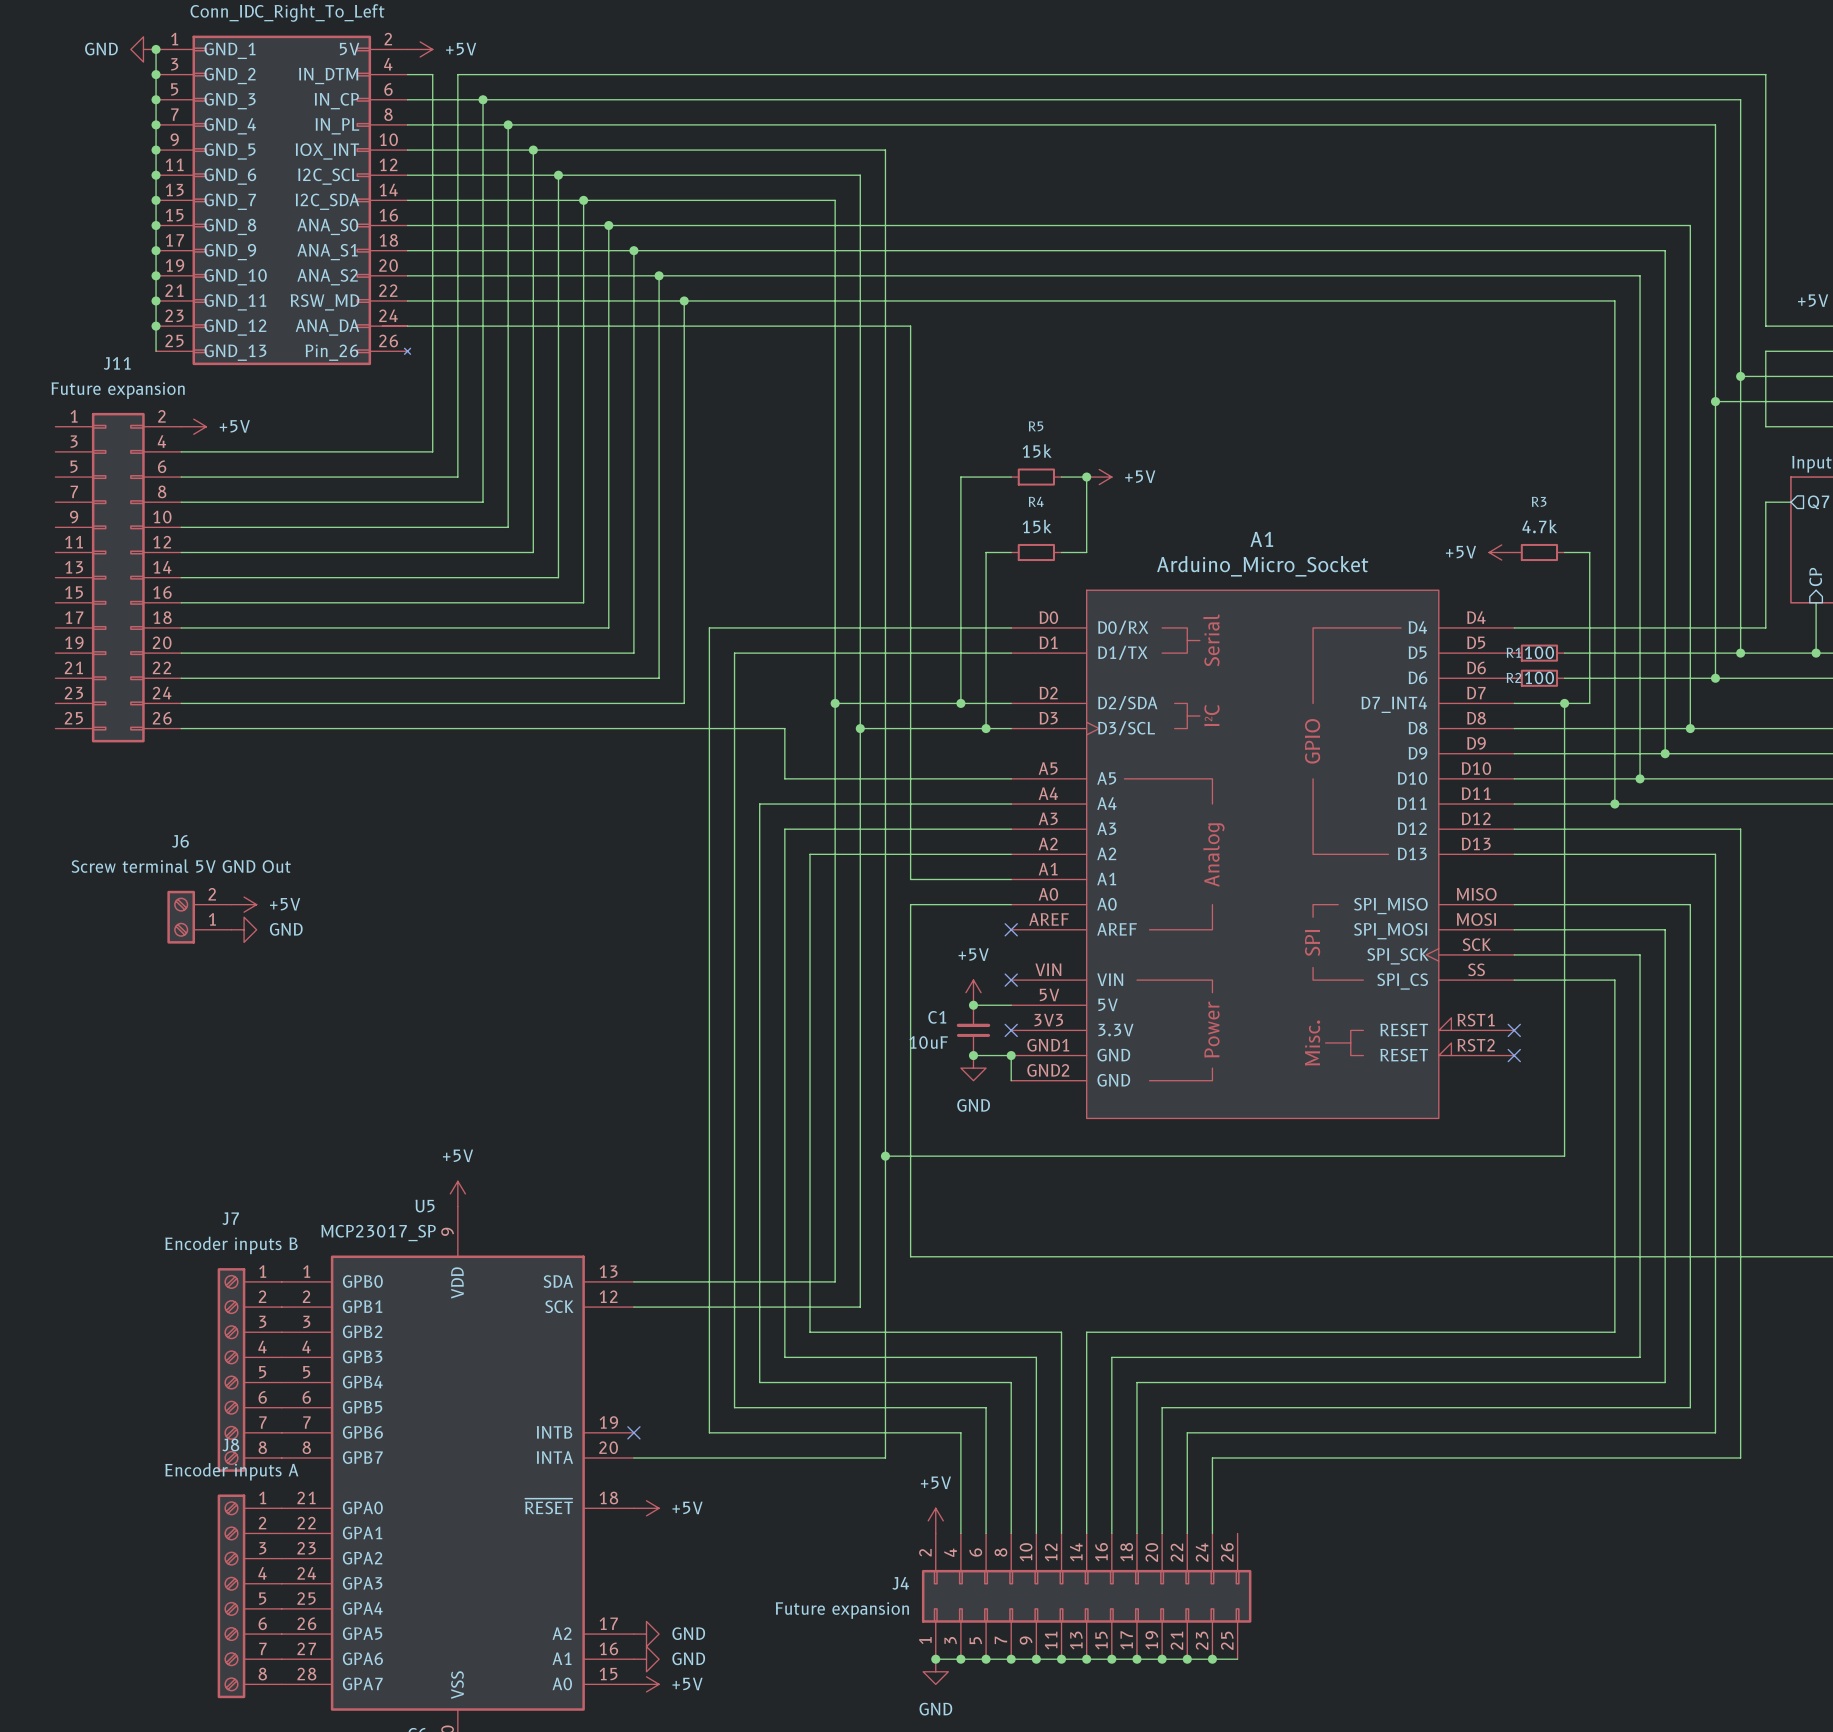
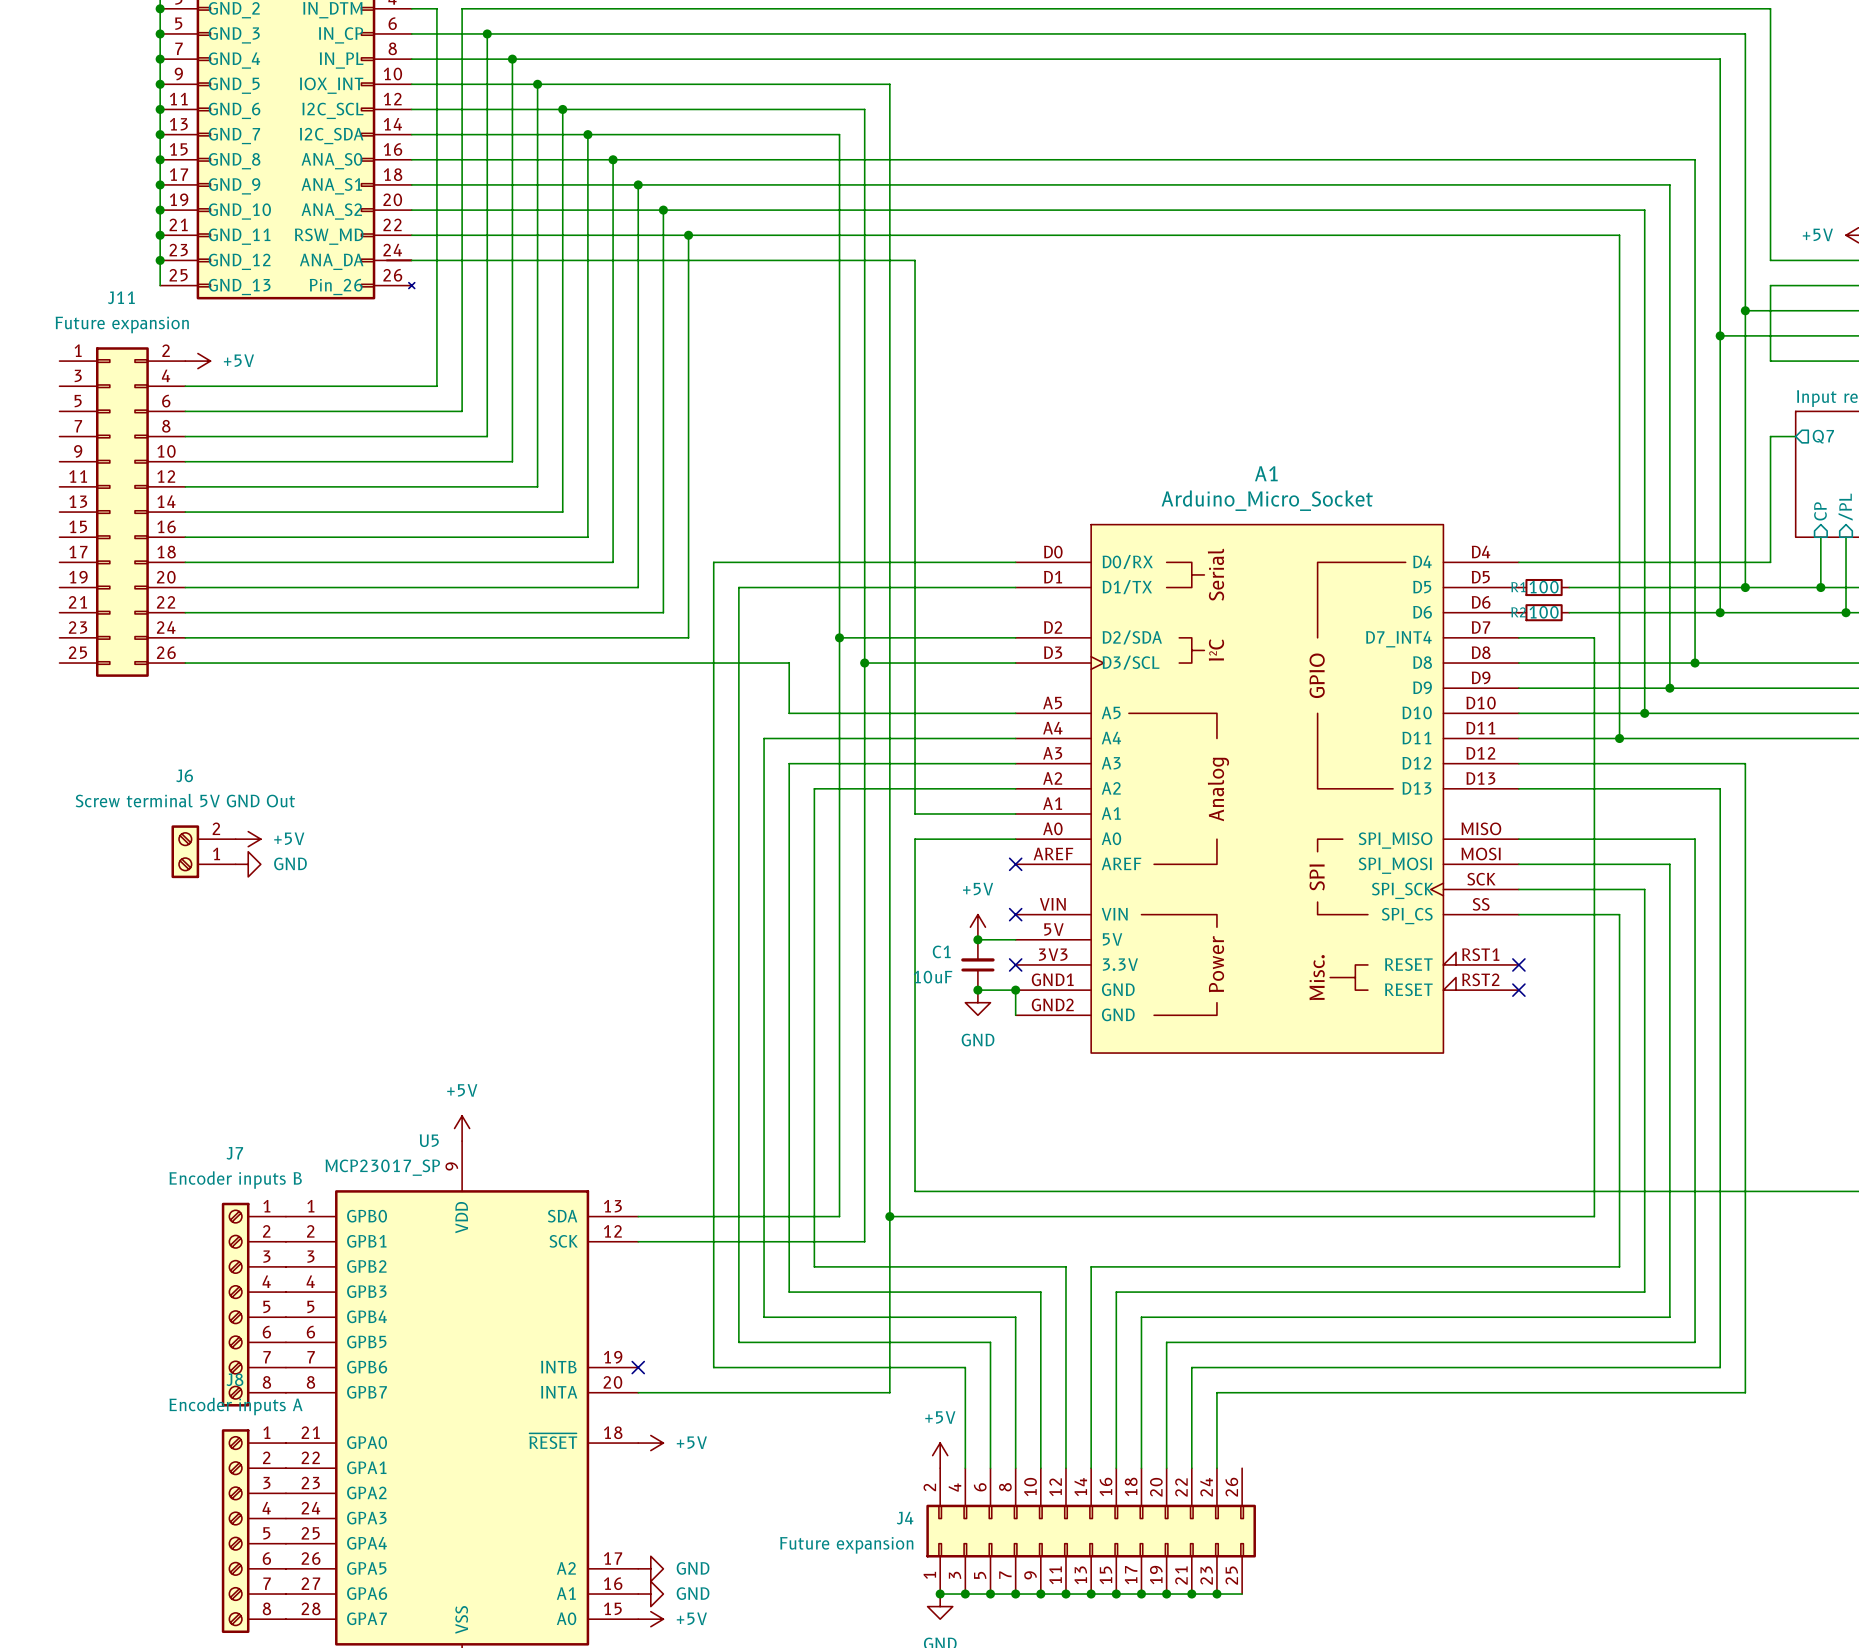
wire: (1011, 477) (960, 477) (960, 703) -> none
R5: 15k (1036, 477) -> none
wire: (1061, 477) (1086, 477) (1086, 552) (1061, 552) -> none
junction: (1086, 477) -> none
power symbol: +5V (1099, 477) -> none
wire: (1011, 552) (986, 552) (986, 728) -> none
R4: 15k (1036, 552) -> none
power symbol: +5V (1501, 552) -> none
R3: 4.7k (1539, 552) -> none
wire: (1564, 552) (1589, 552) (1589, 703) -> (889, 1216) (1594, 1216) (1594, 637)
junction: (960, 703) -> none
wire: (1564, 703) (1564, 1156) (885, 1156) -> none
junction: (1564, 703) -> none
junction: (986, 728) -> none
junction: (885, 1156) -> none
junction: none -> (889, 1216)

